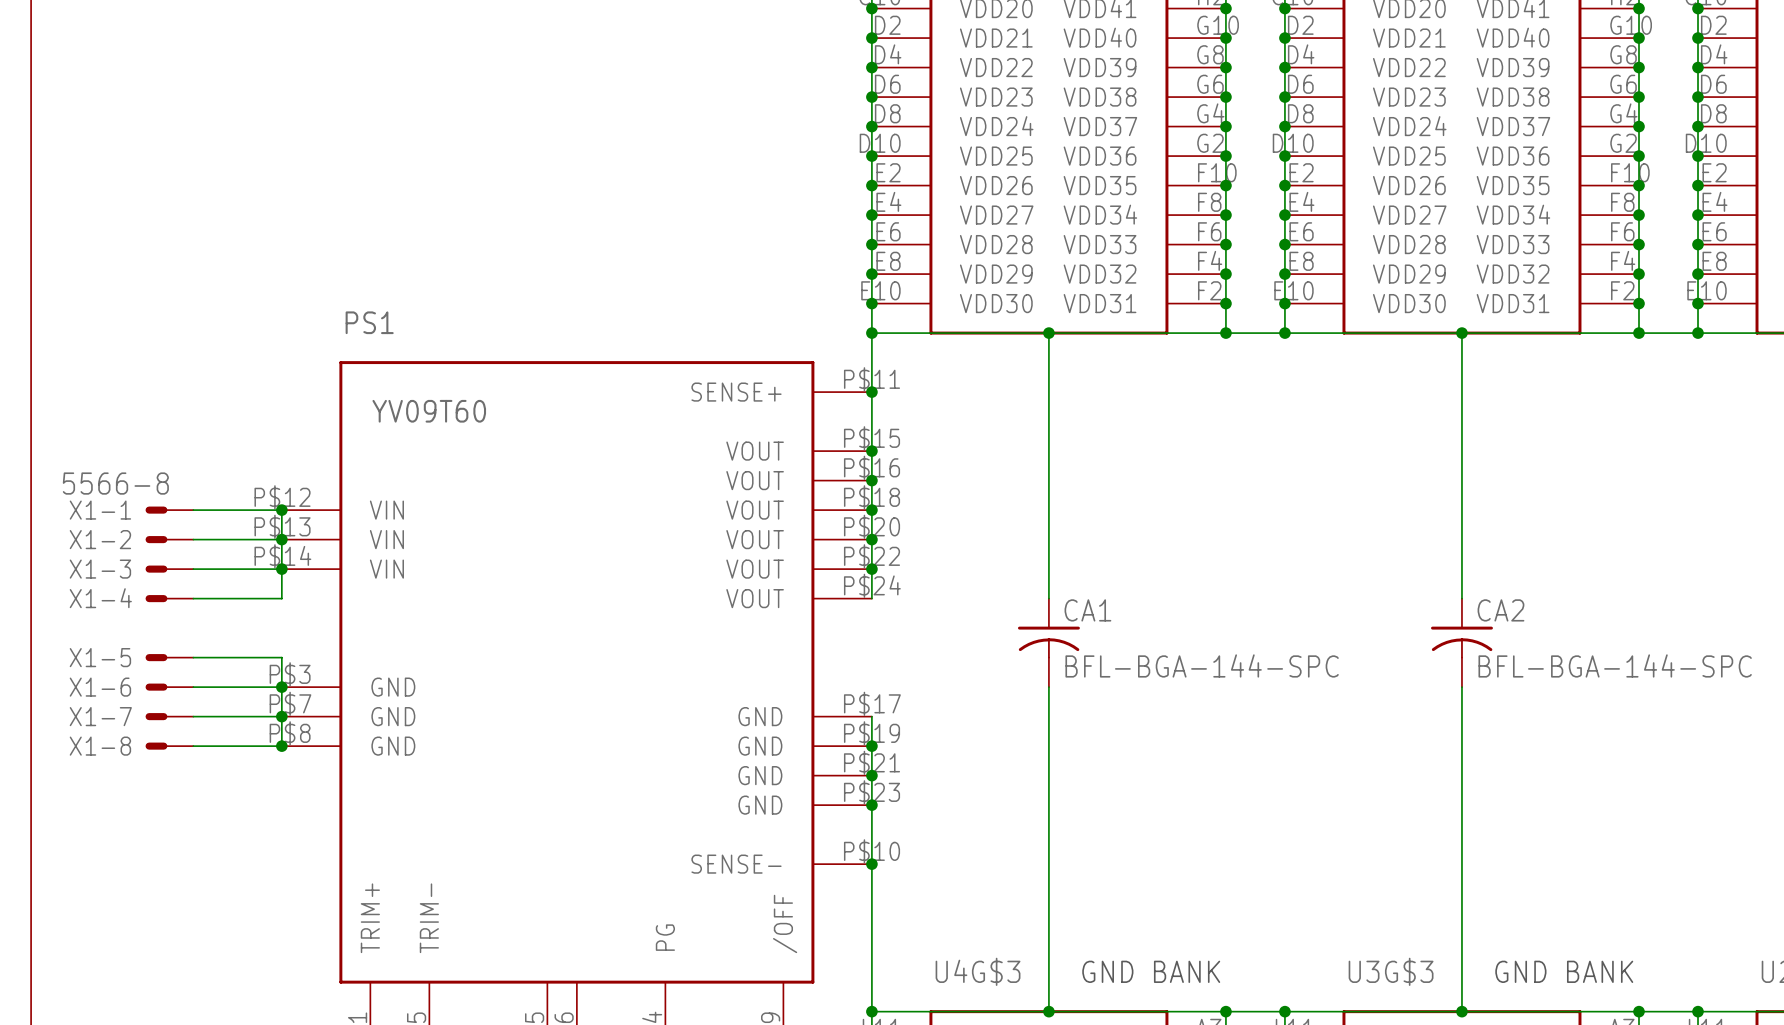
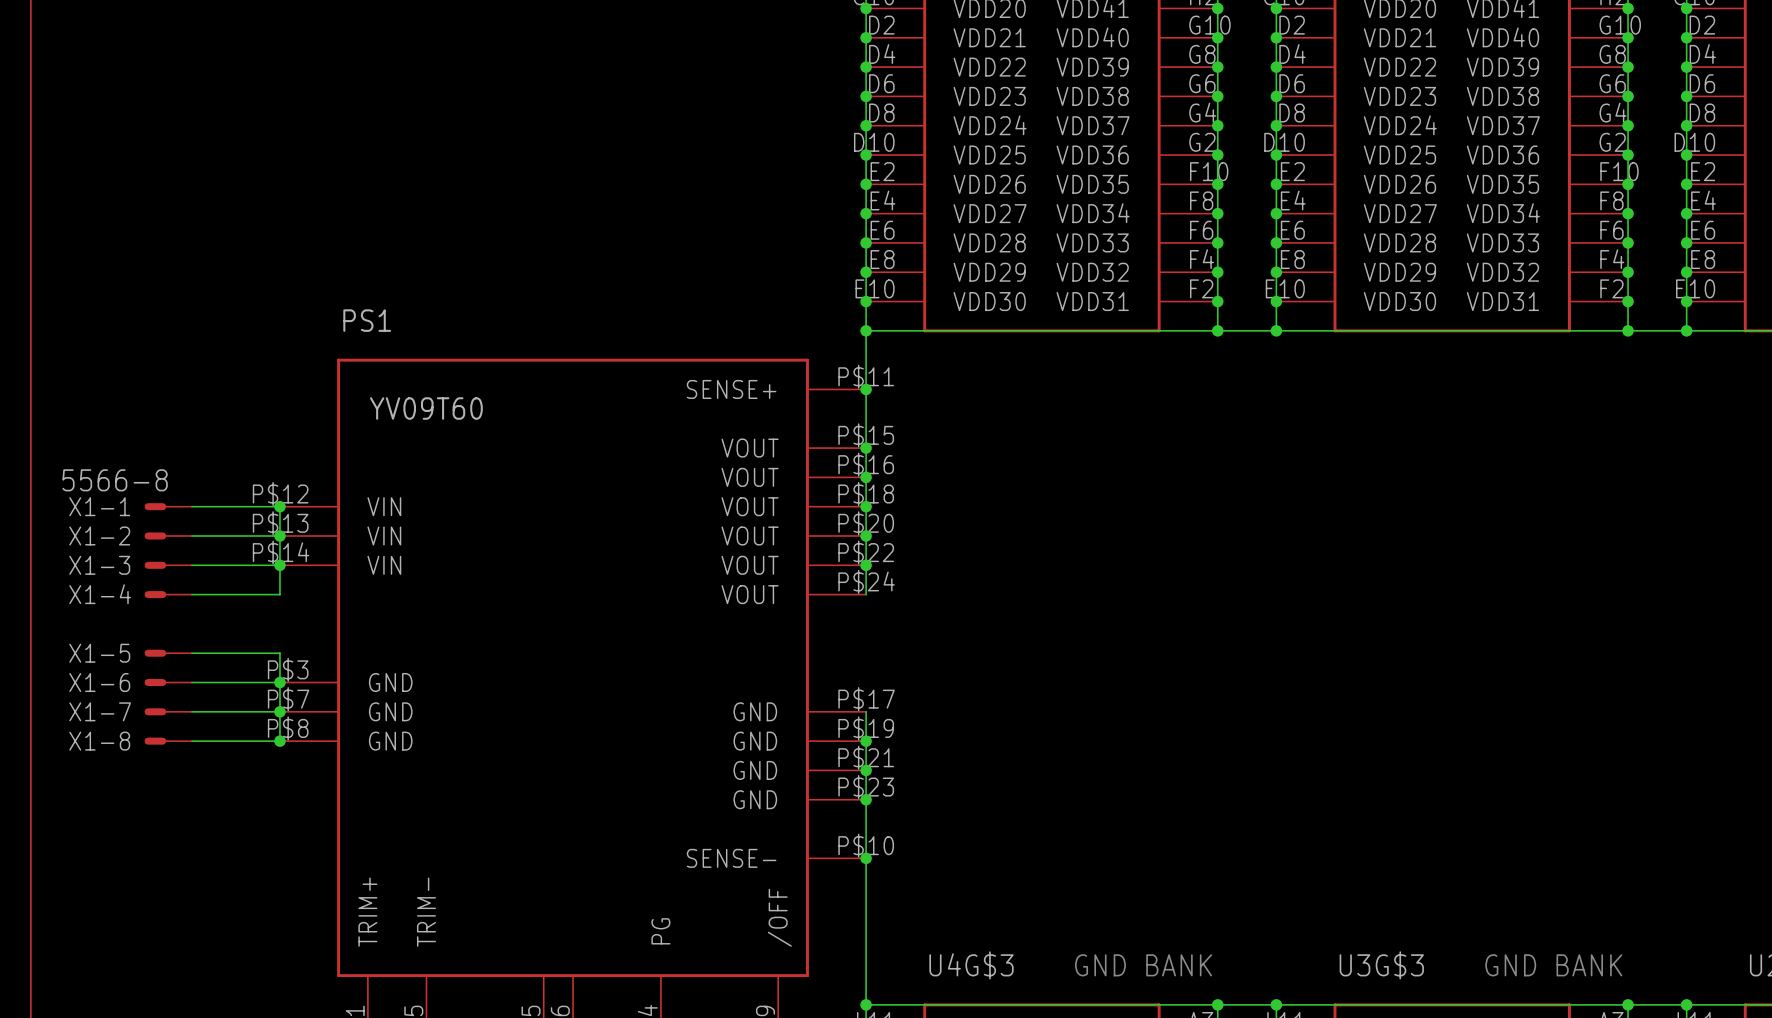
wire: (1048, 333) (1048, 598) -> none
junction: (1048, 333) -> none
wire: (1461, 333) (1461, 598) -> none
junction: (1461, 333) -> none
CA1: BFL-BGA-144-SPC (1048, 642) -> none
CA2: BFL-BGA-144-SPC (1461, 642) -> none
wire: (1048, 687) (1048, 1011) -> none
wire: (1461, 687) (1461, 1011) -> none
junction: (1048, 1011) -> none
junction: (1461, 1011) -> none

